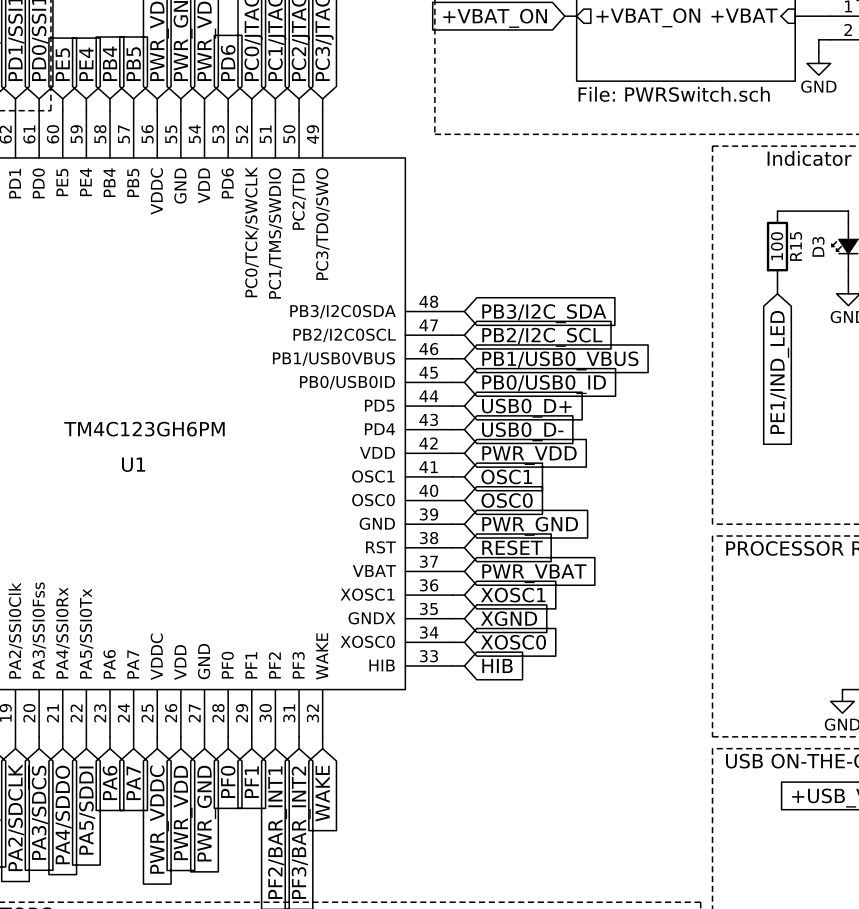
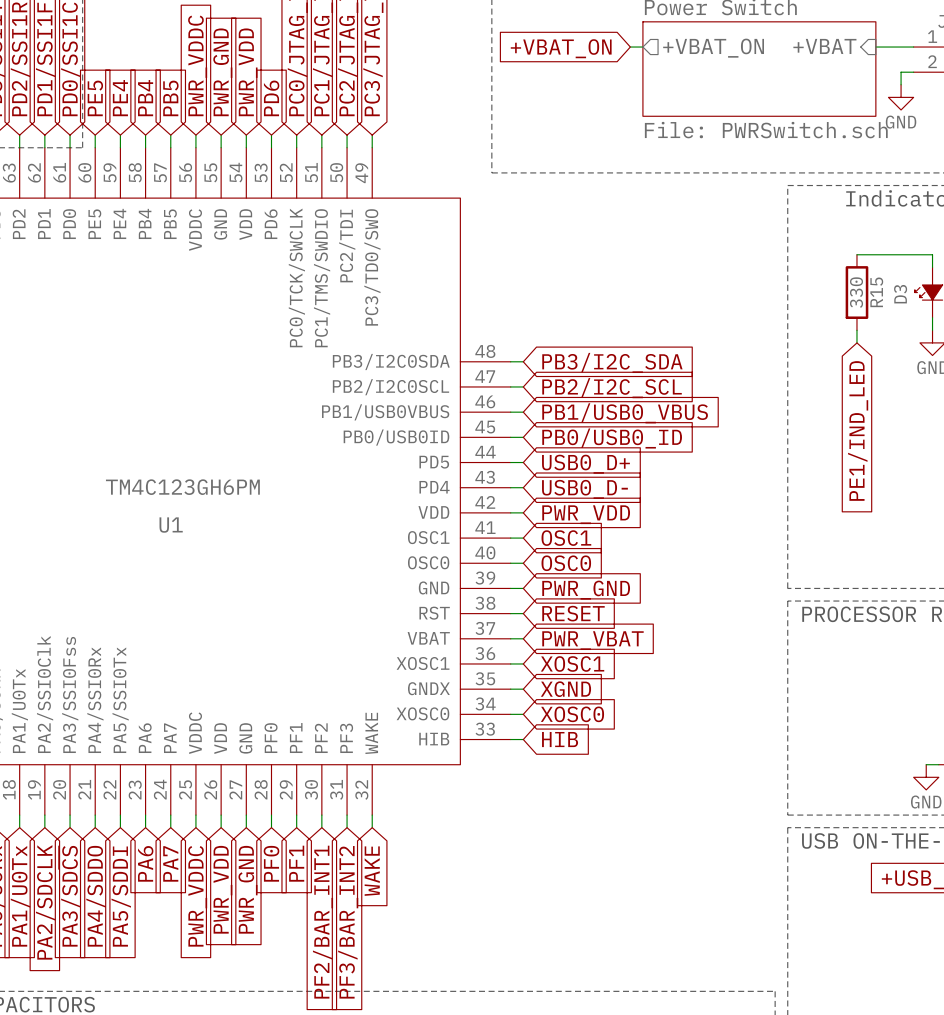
R15 value: 100 (777, 246) -> 330 (856, 292)

